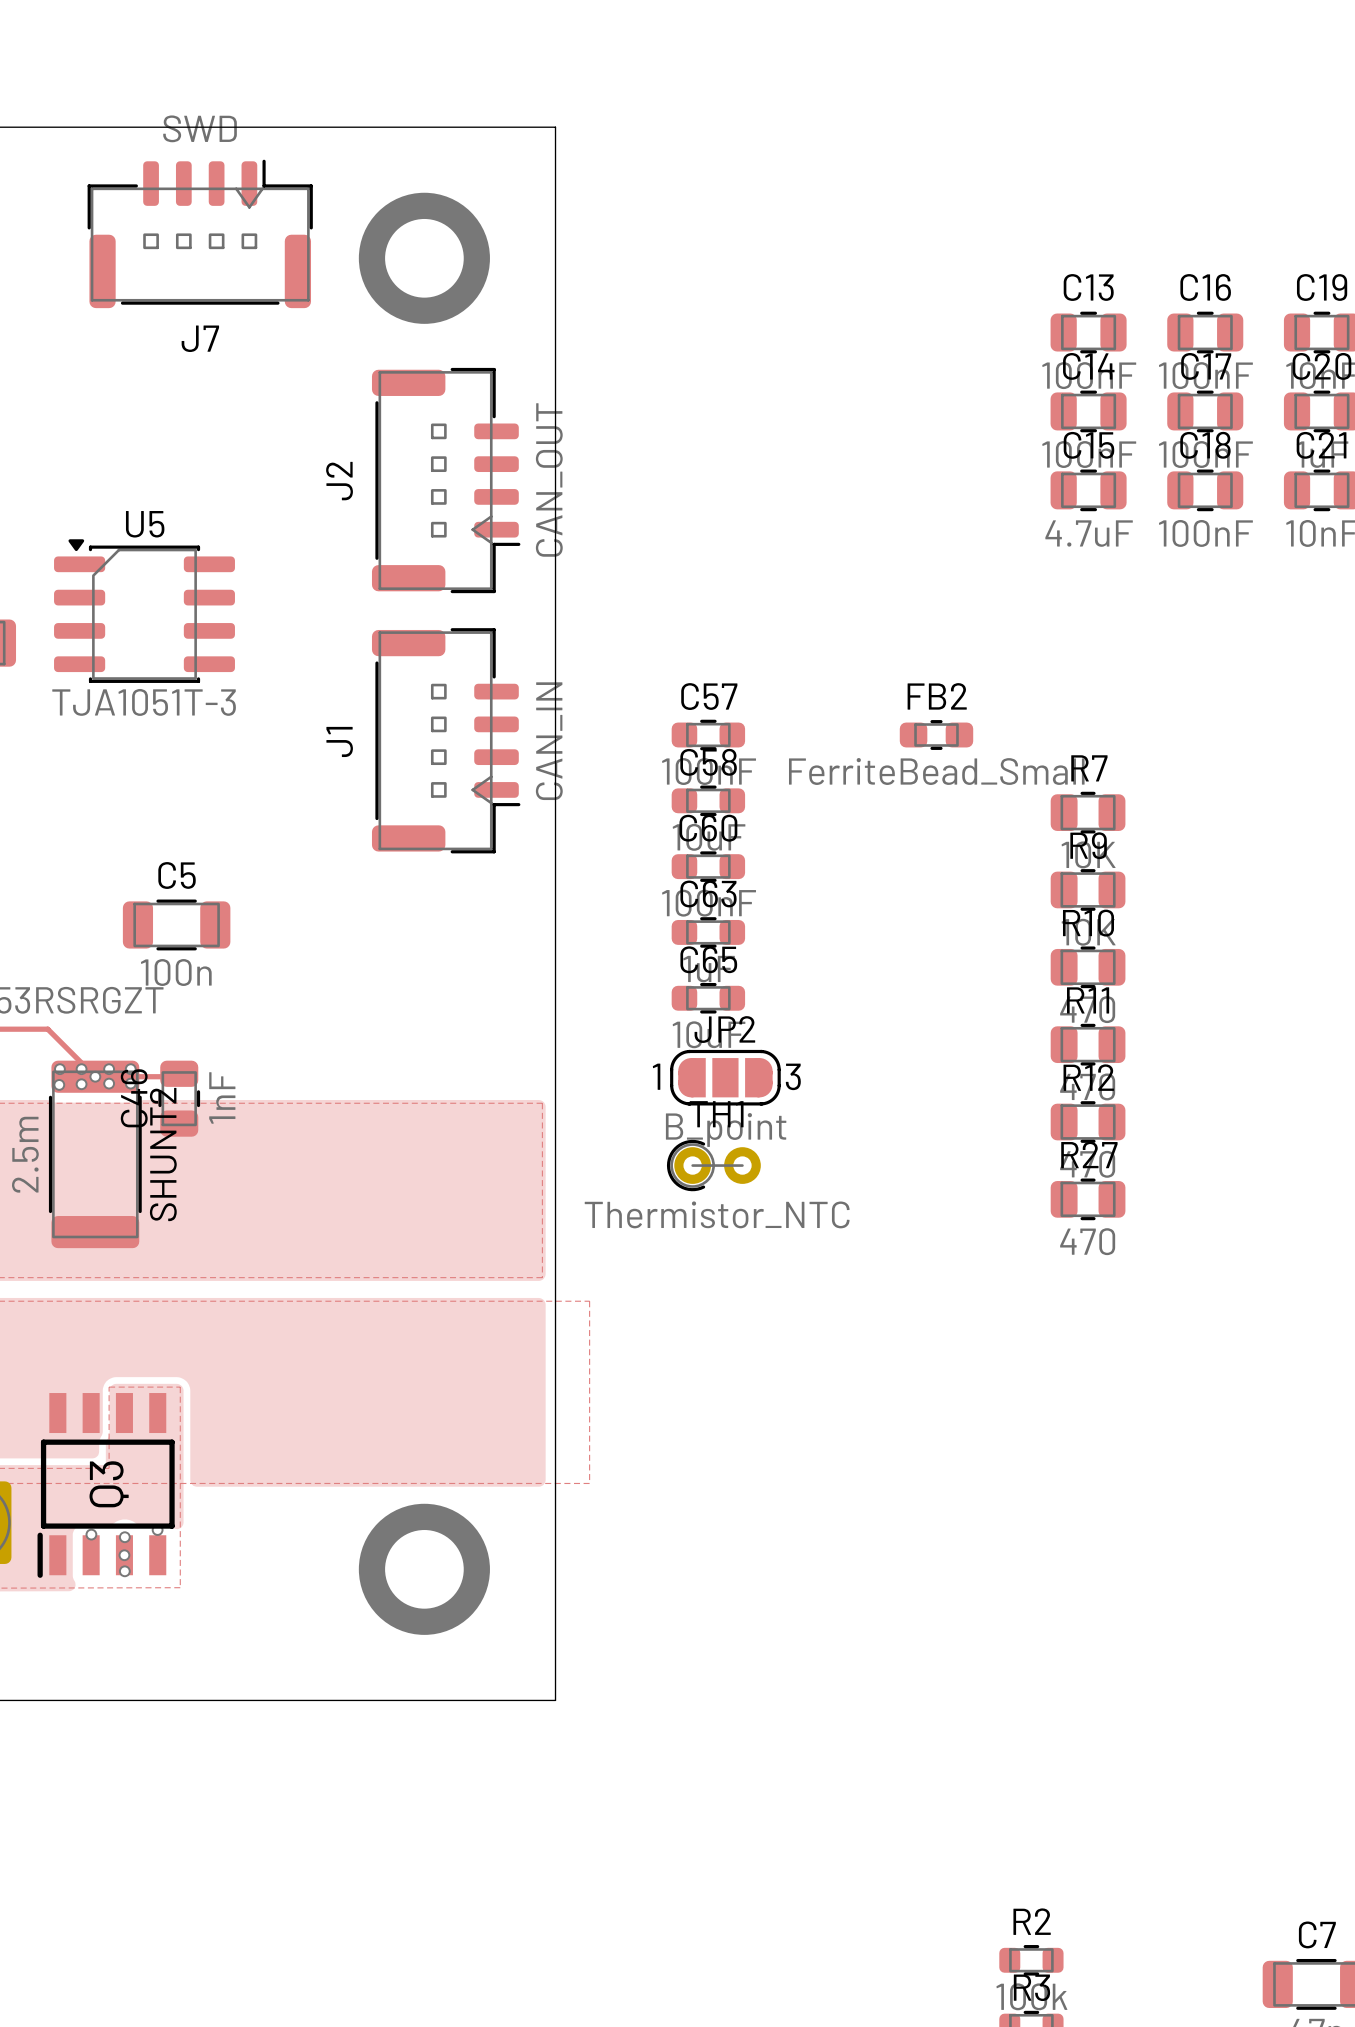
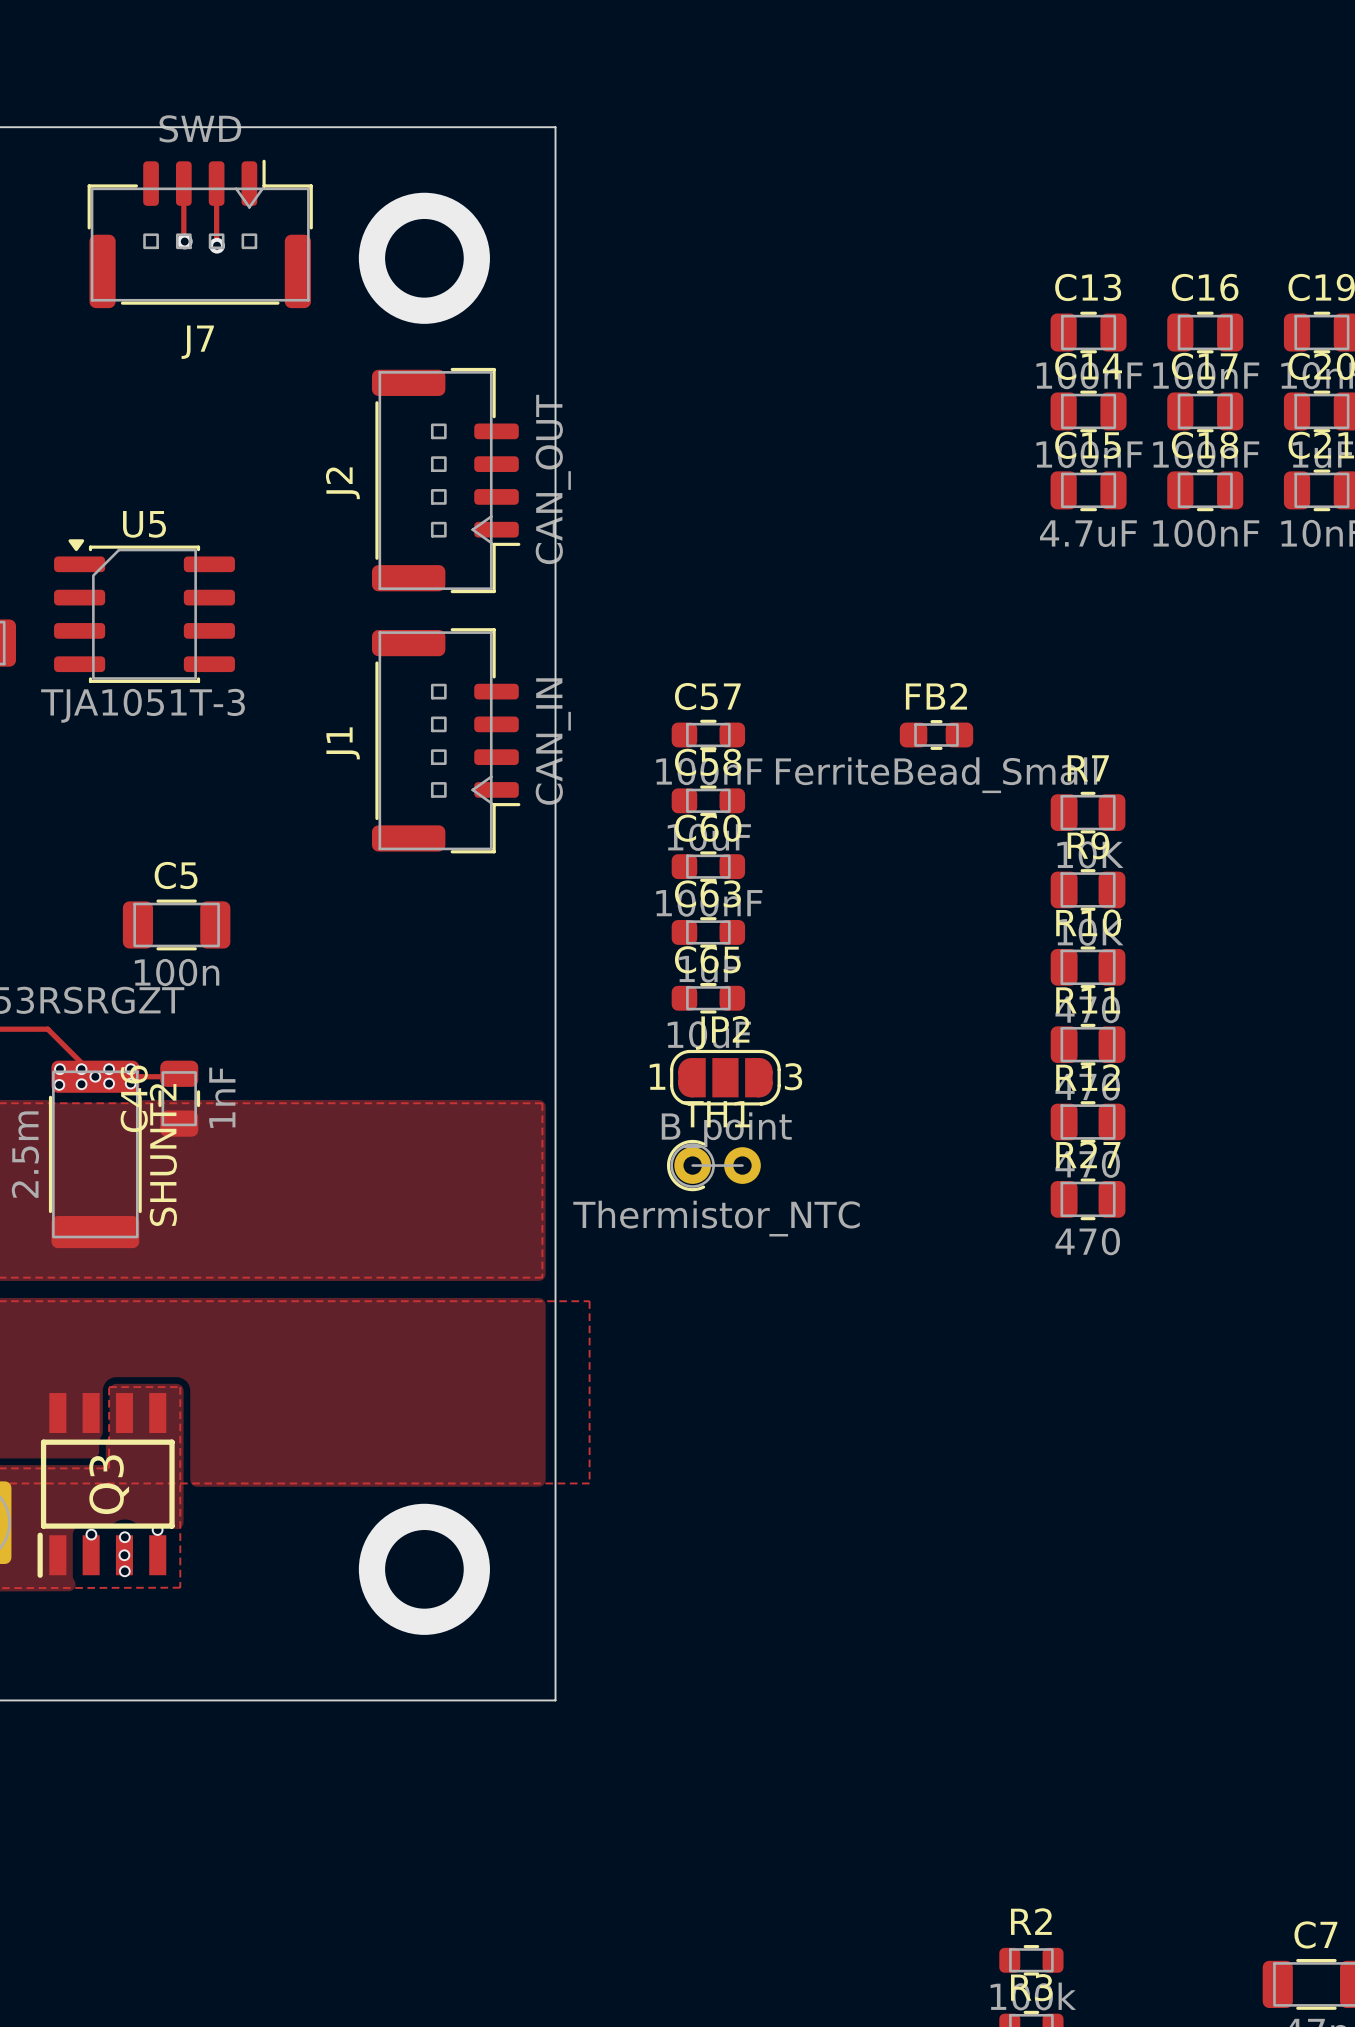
track: none -> (183, 183) (184, 241)
track: none -> (216, 183) (217, 245)
via: none -> (184, 241)
via: none -> (217, 245)

